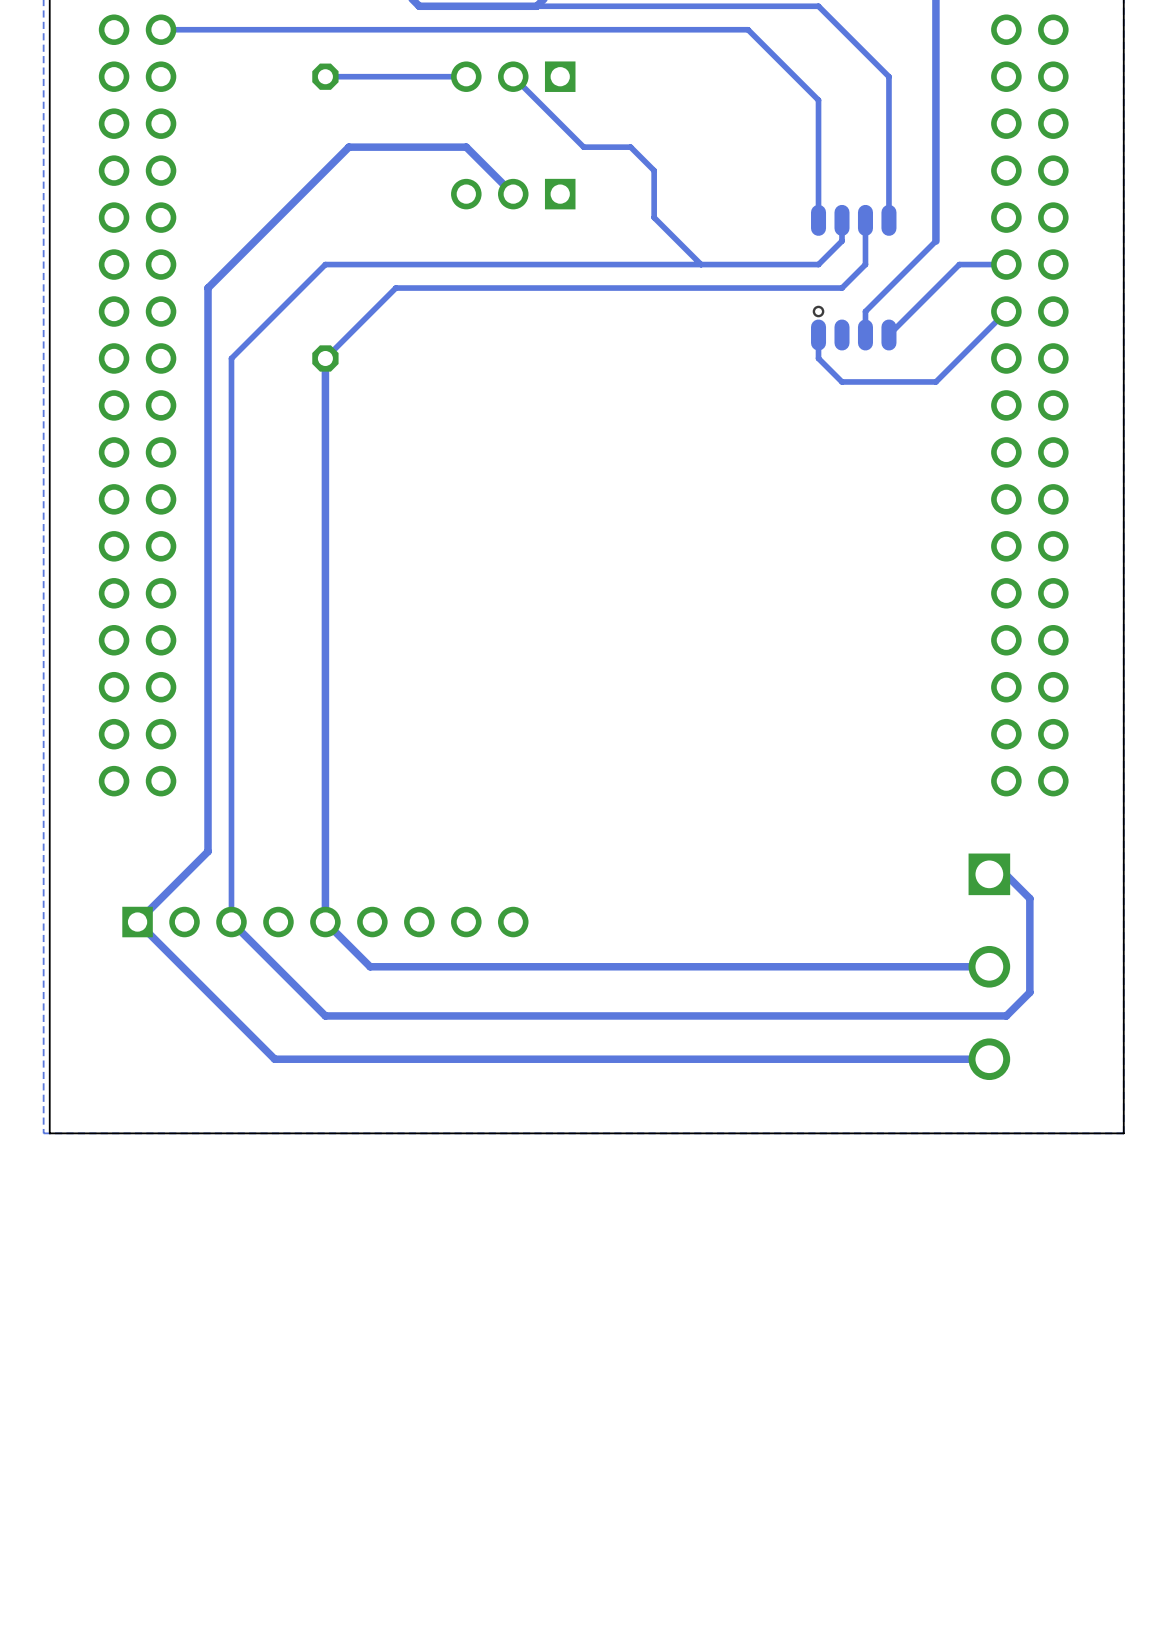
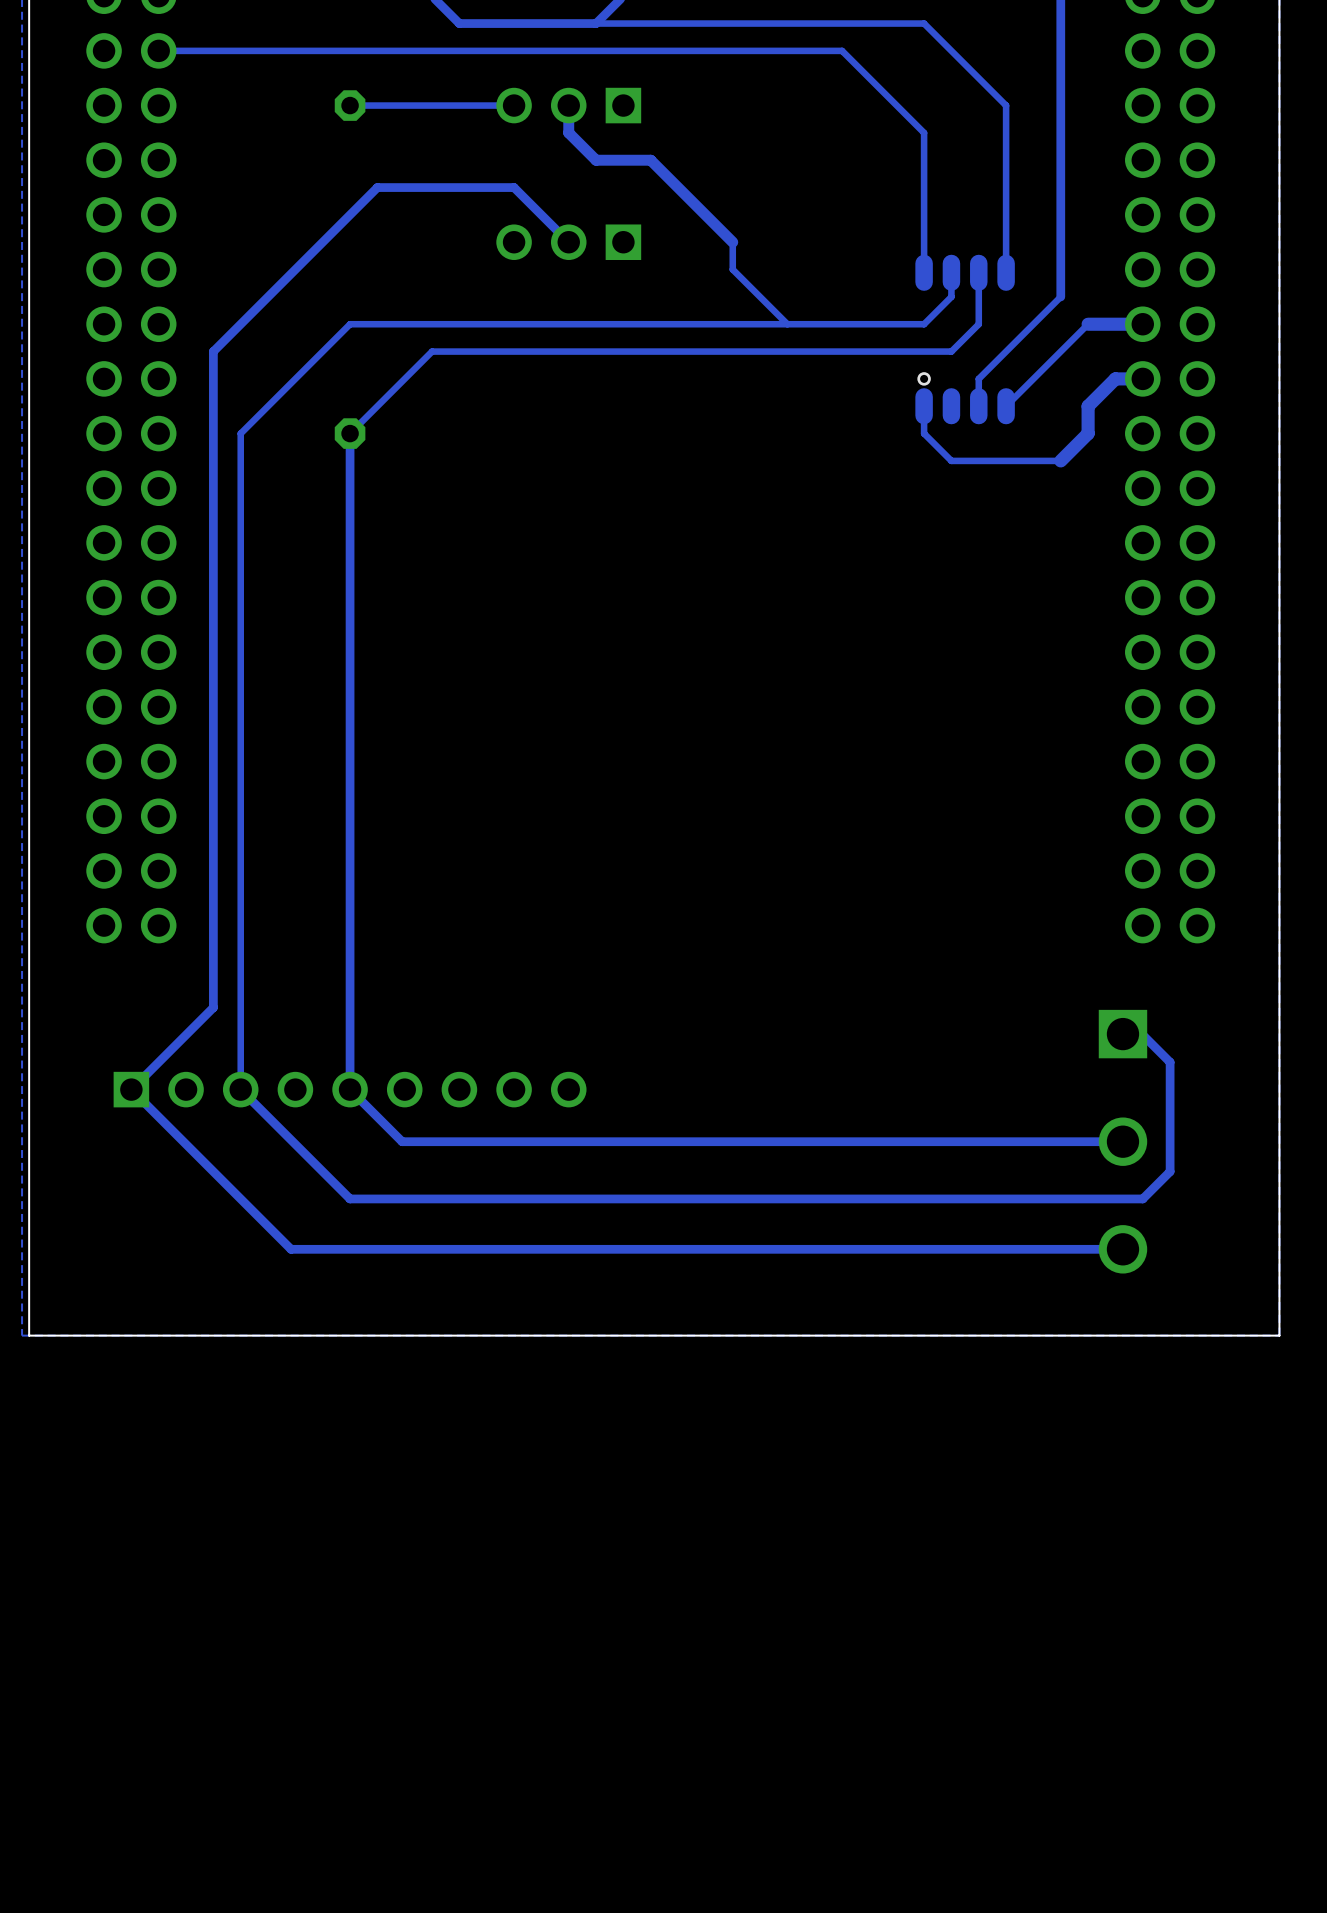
bottom track: (513, 76) (583, 147) (630, 147) (654, 170) (654, 194) -> (568, 105) (568, 132) (596, 160) (650, 160) (732, 242)
bottom track width: thin (1006, 264) (959, 264) -> thick (1142, 324) (1088, 324)
bottom track: (1006, 311) (959, 358) -> (1142, 378) (1115, 378) (1088, 406) (1088, 433)
bottom track width: thin (959, 358) (935, 381) -> thick (1088, 433) (1060, 460)

